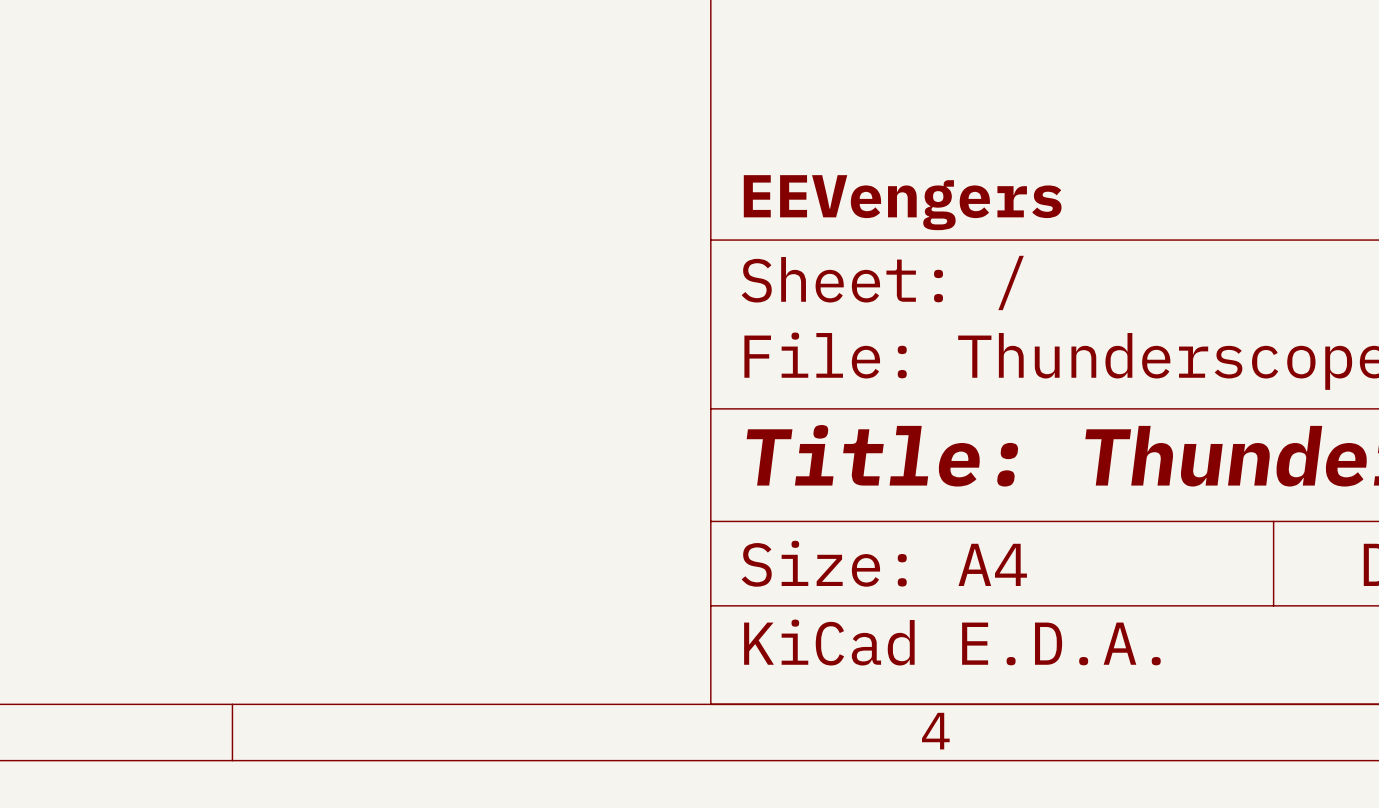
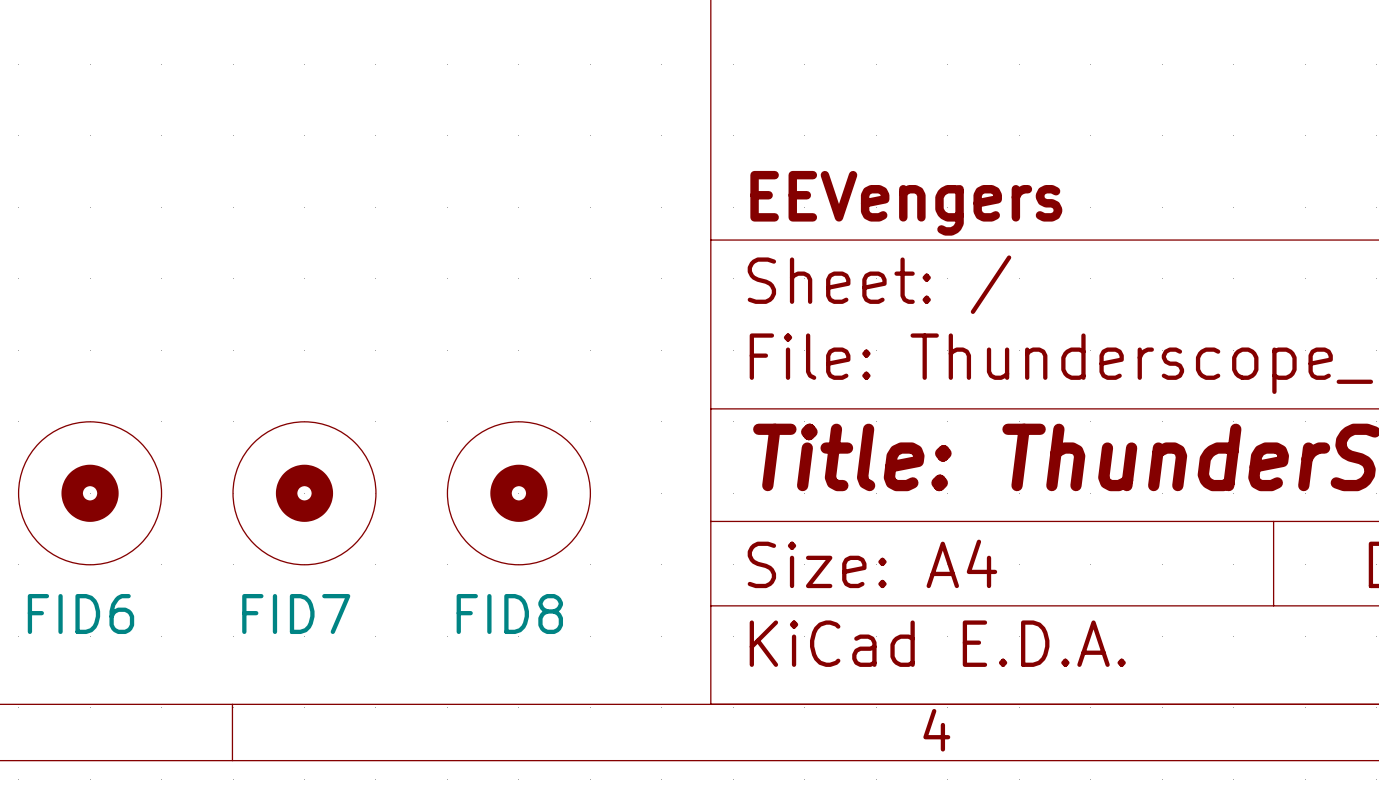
FID6: none -> (90, 493)
FID7: none -> (304, 493)
FID8: none -> (518, 493)

